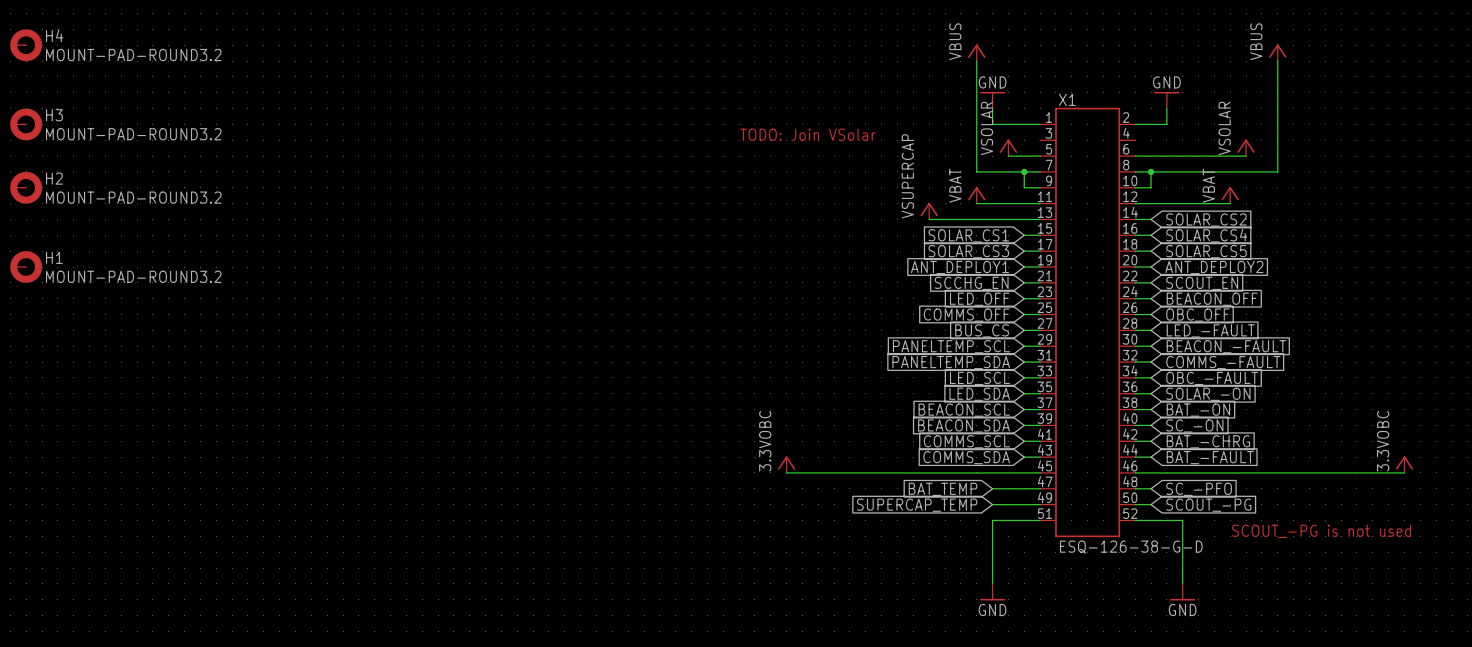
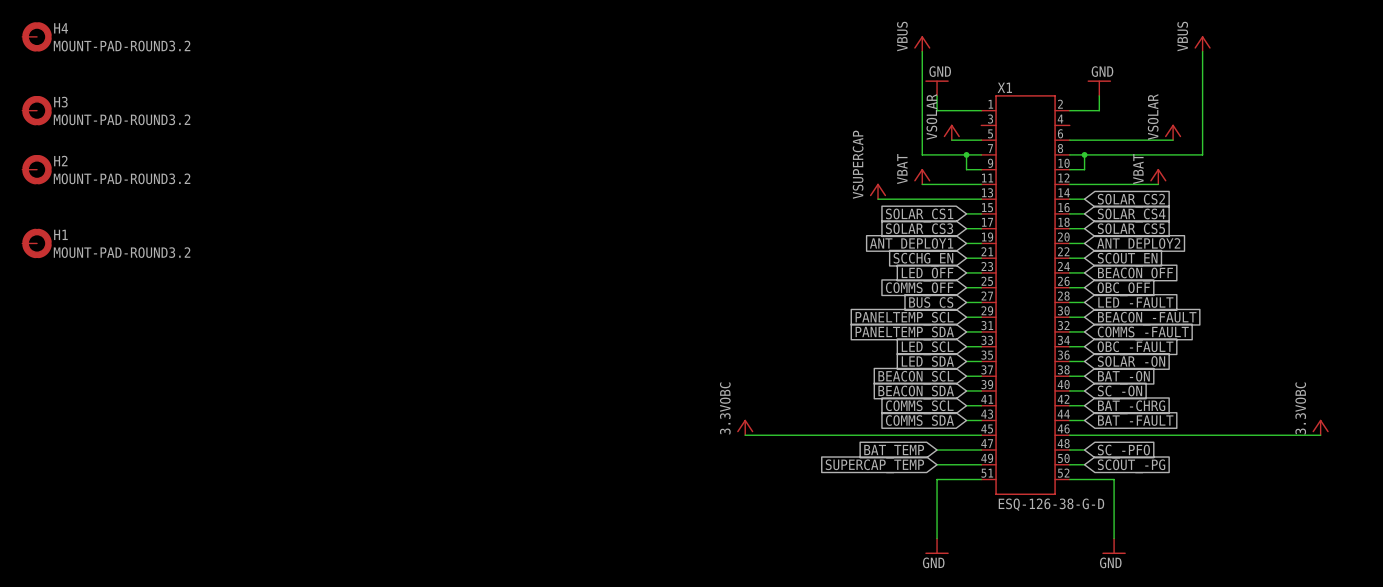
text: TODO: Join VSolar (807, 134) -> none
text: SCOUT_-PG is not used (1321, 531) -> none

